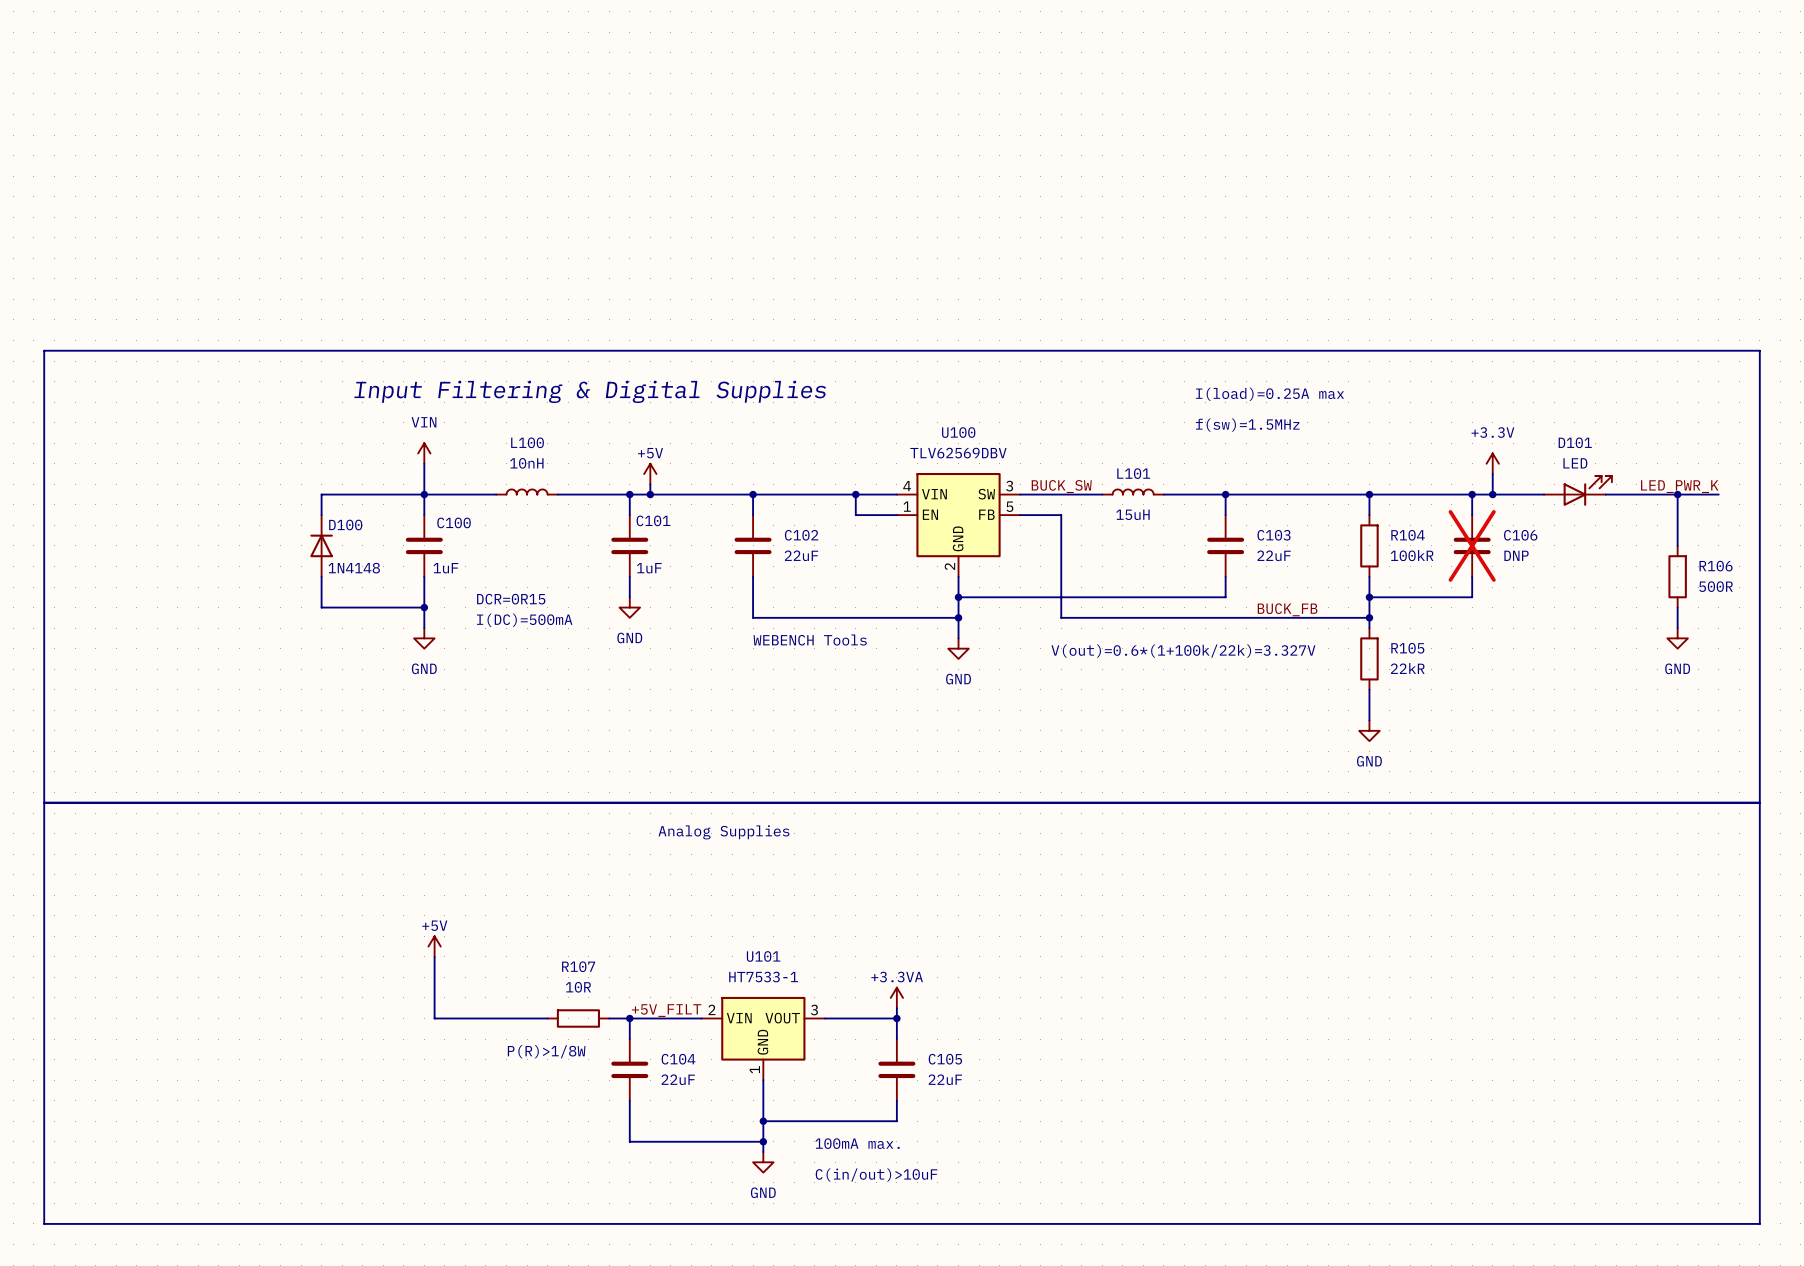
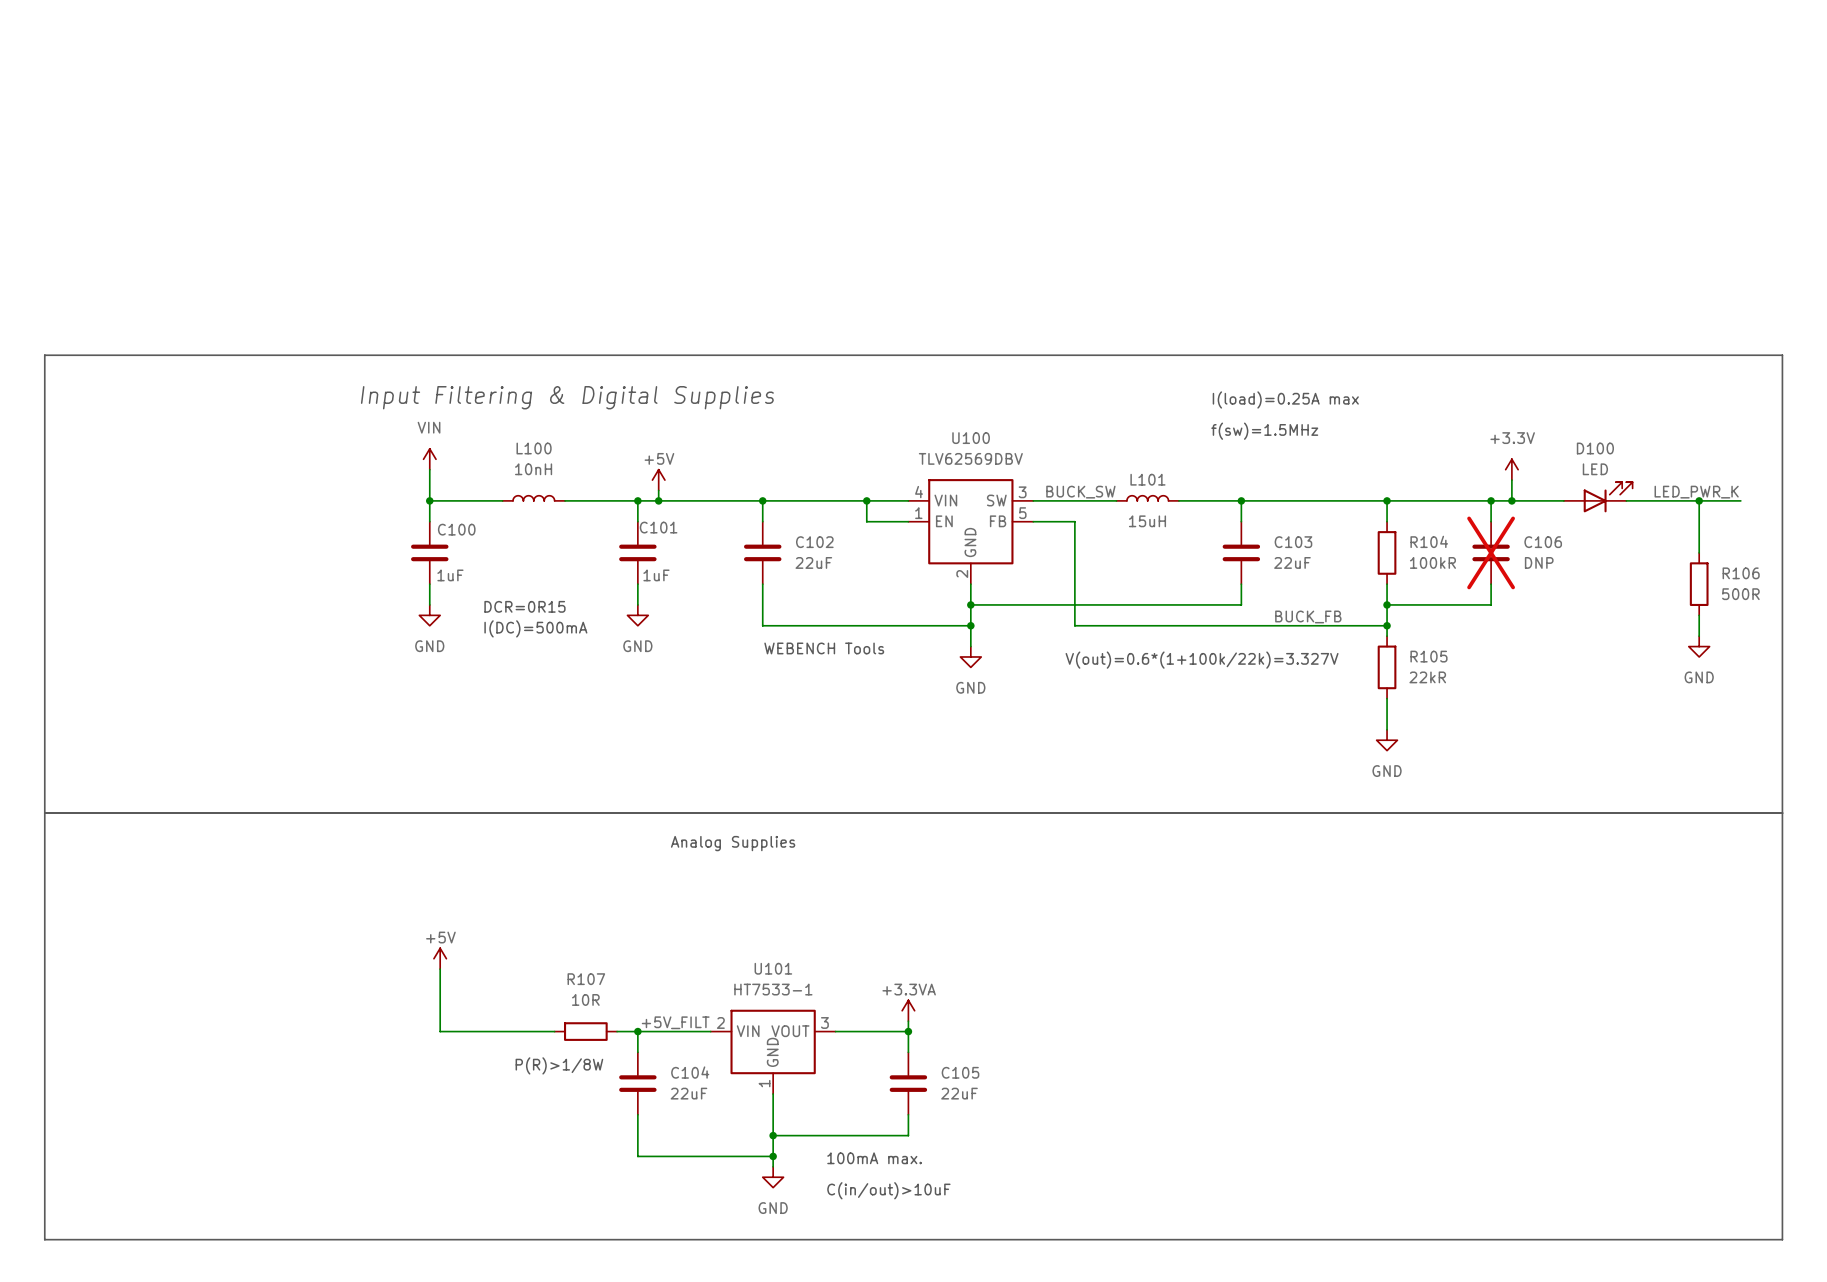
D101 name: D101 (1575, 442) -> D100 (1595, 448)
wire: (424, 494) (321, 494) (321, 515) -> none
D100: 1N4148 (321, 545) -> none
wire: (321, 576) (321, 607) (424, 607) -> none
wire: (424, 597) (424, 628) -> none
junction: (424, 607) -> none
power symbol position: GND (424, 638) -> GND (429, 615)

